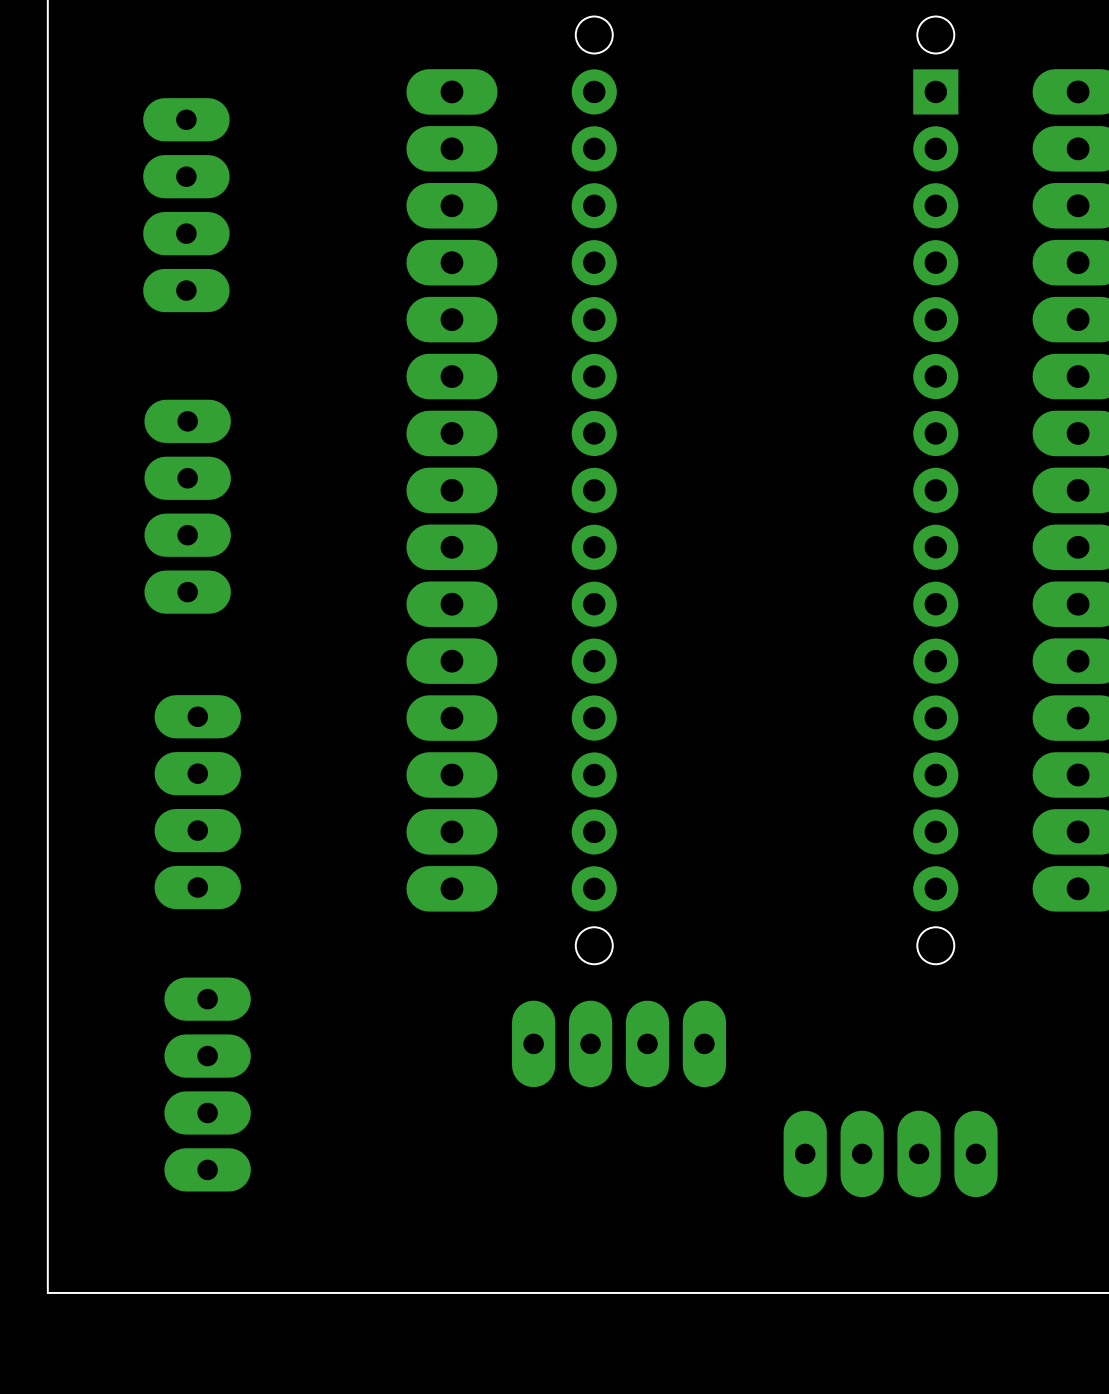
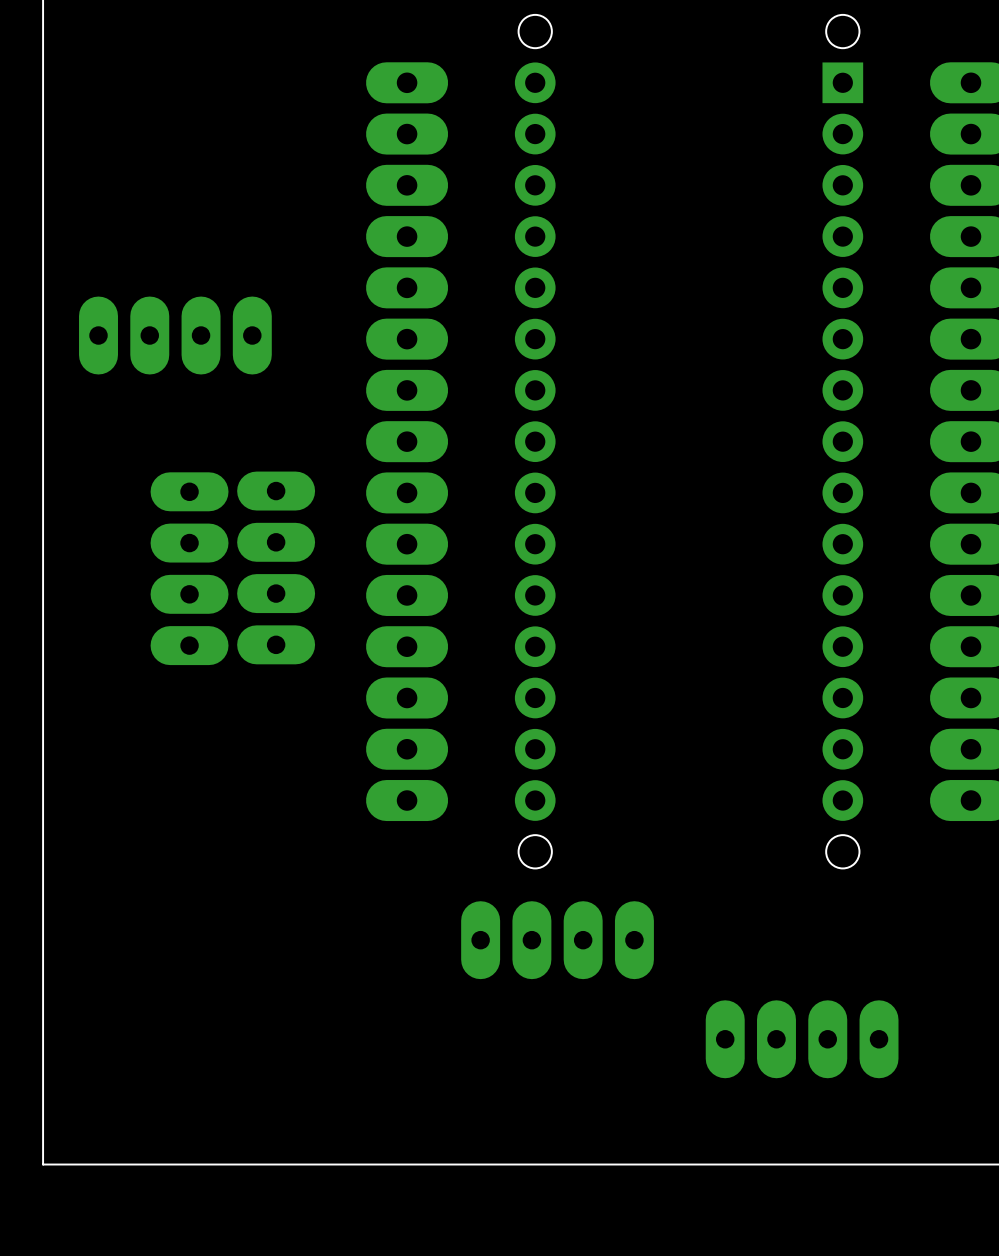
part: (186, 205) -> none
part: none -> (175, 335)
part: (187, 506) -> none
part: none -> (276, 567)
part: none -> (189, 568)
part: (197, 802) -> none
part: (207, 1084) -> none

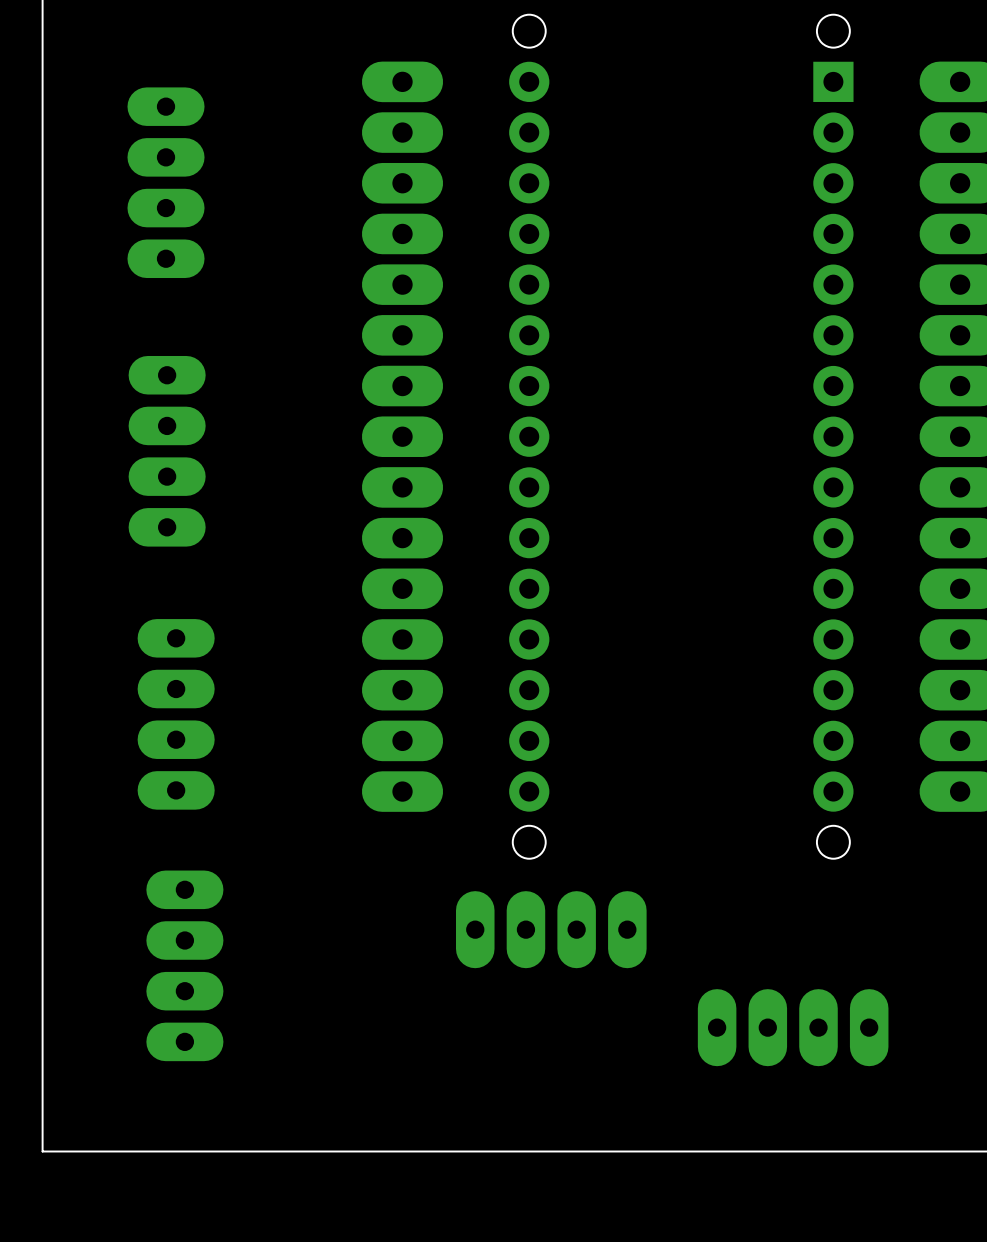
part: none -> (166, 182)
part: (175, 335) -> none
part: none -> (167, 451)
part: (276, 567) -> none
part: (189, 568) -> none
part: none -> (176, 714)
part: none -> (184, 965)

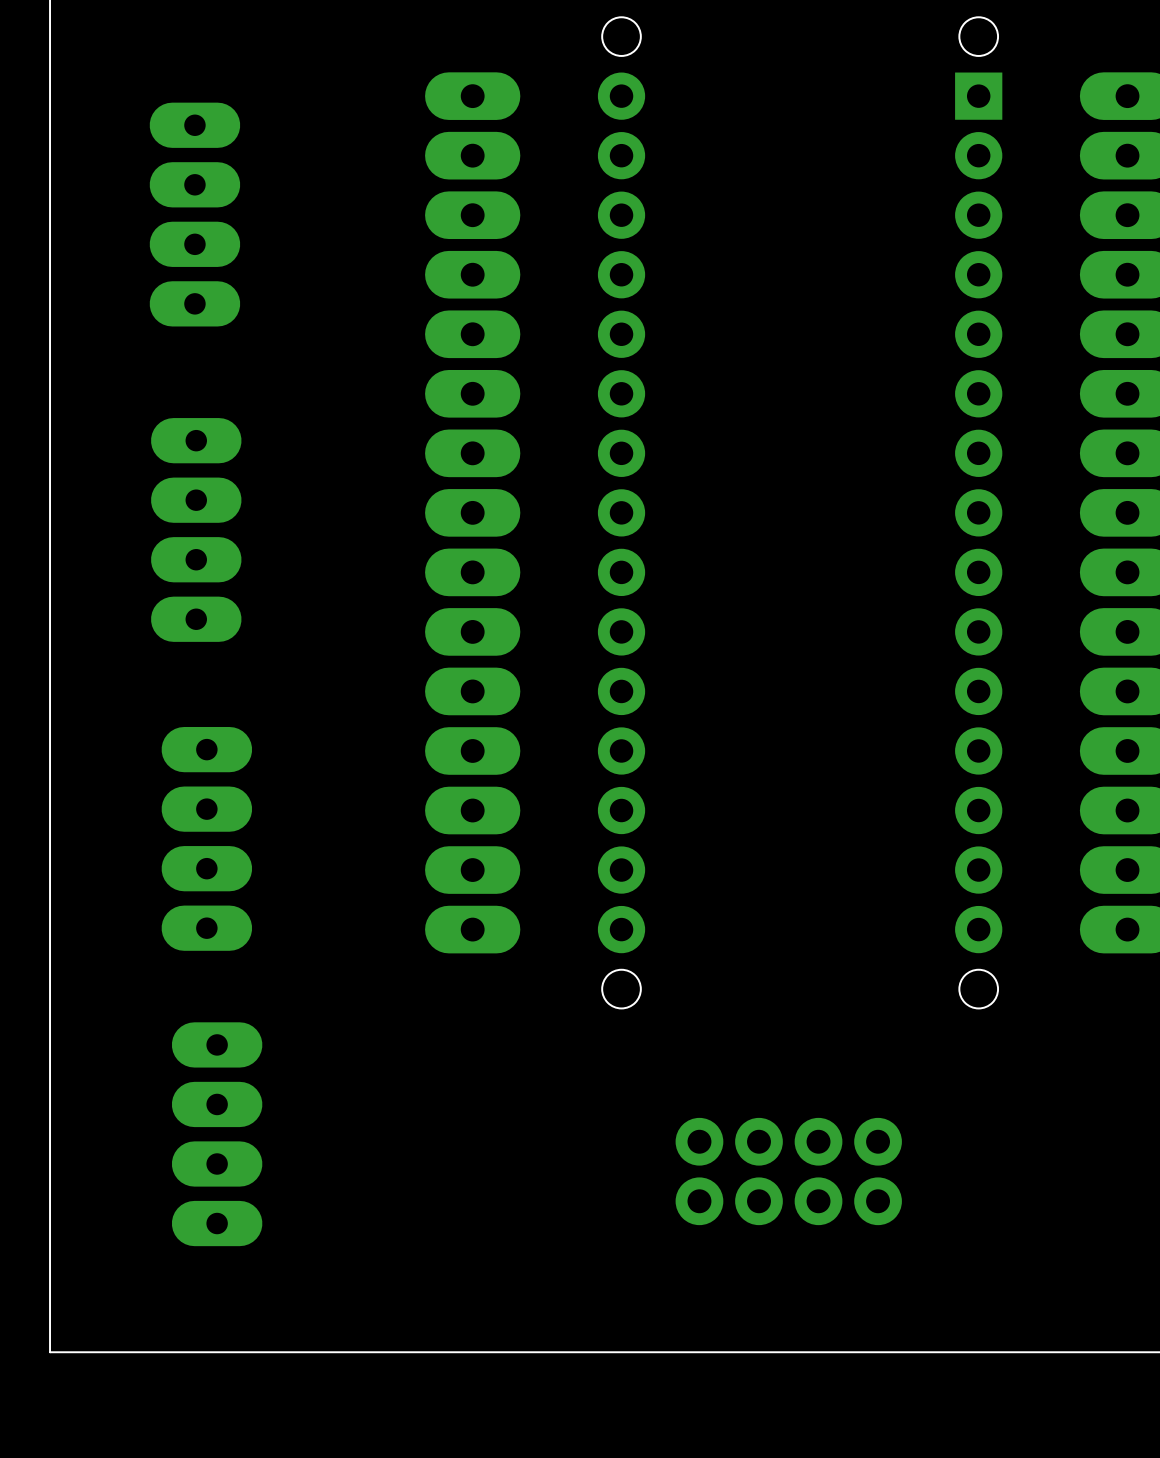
part: (551, 929) -> none
part: none -> (788, 1171)
part: (793, 1027) -> none

